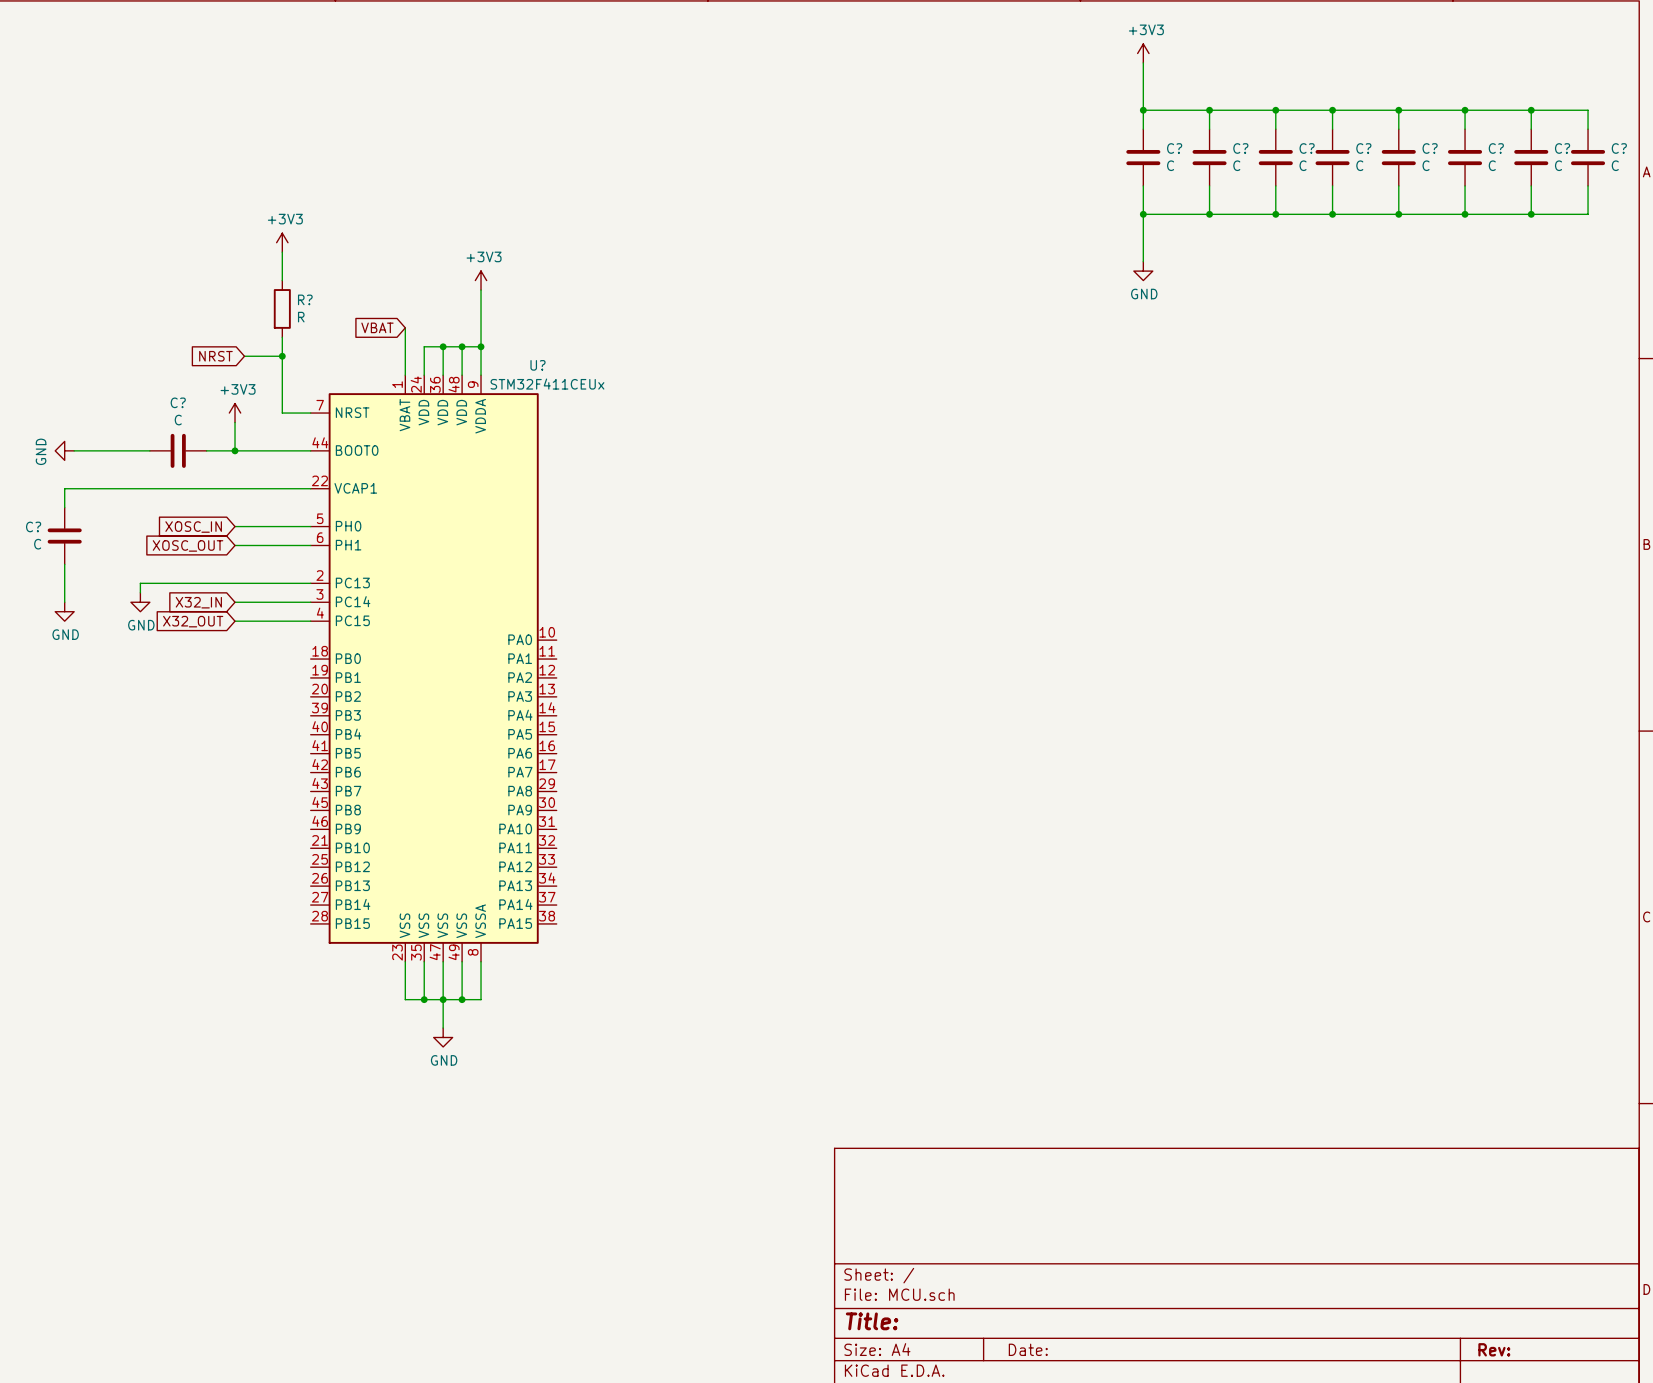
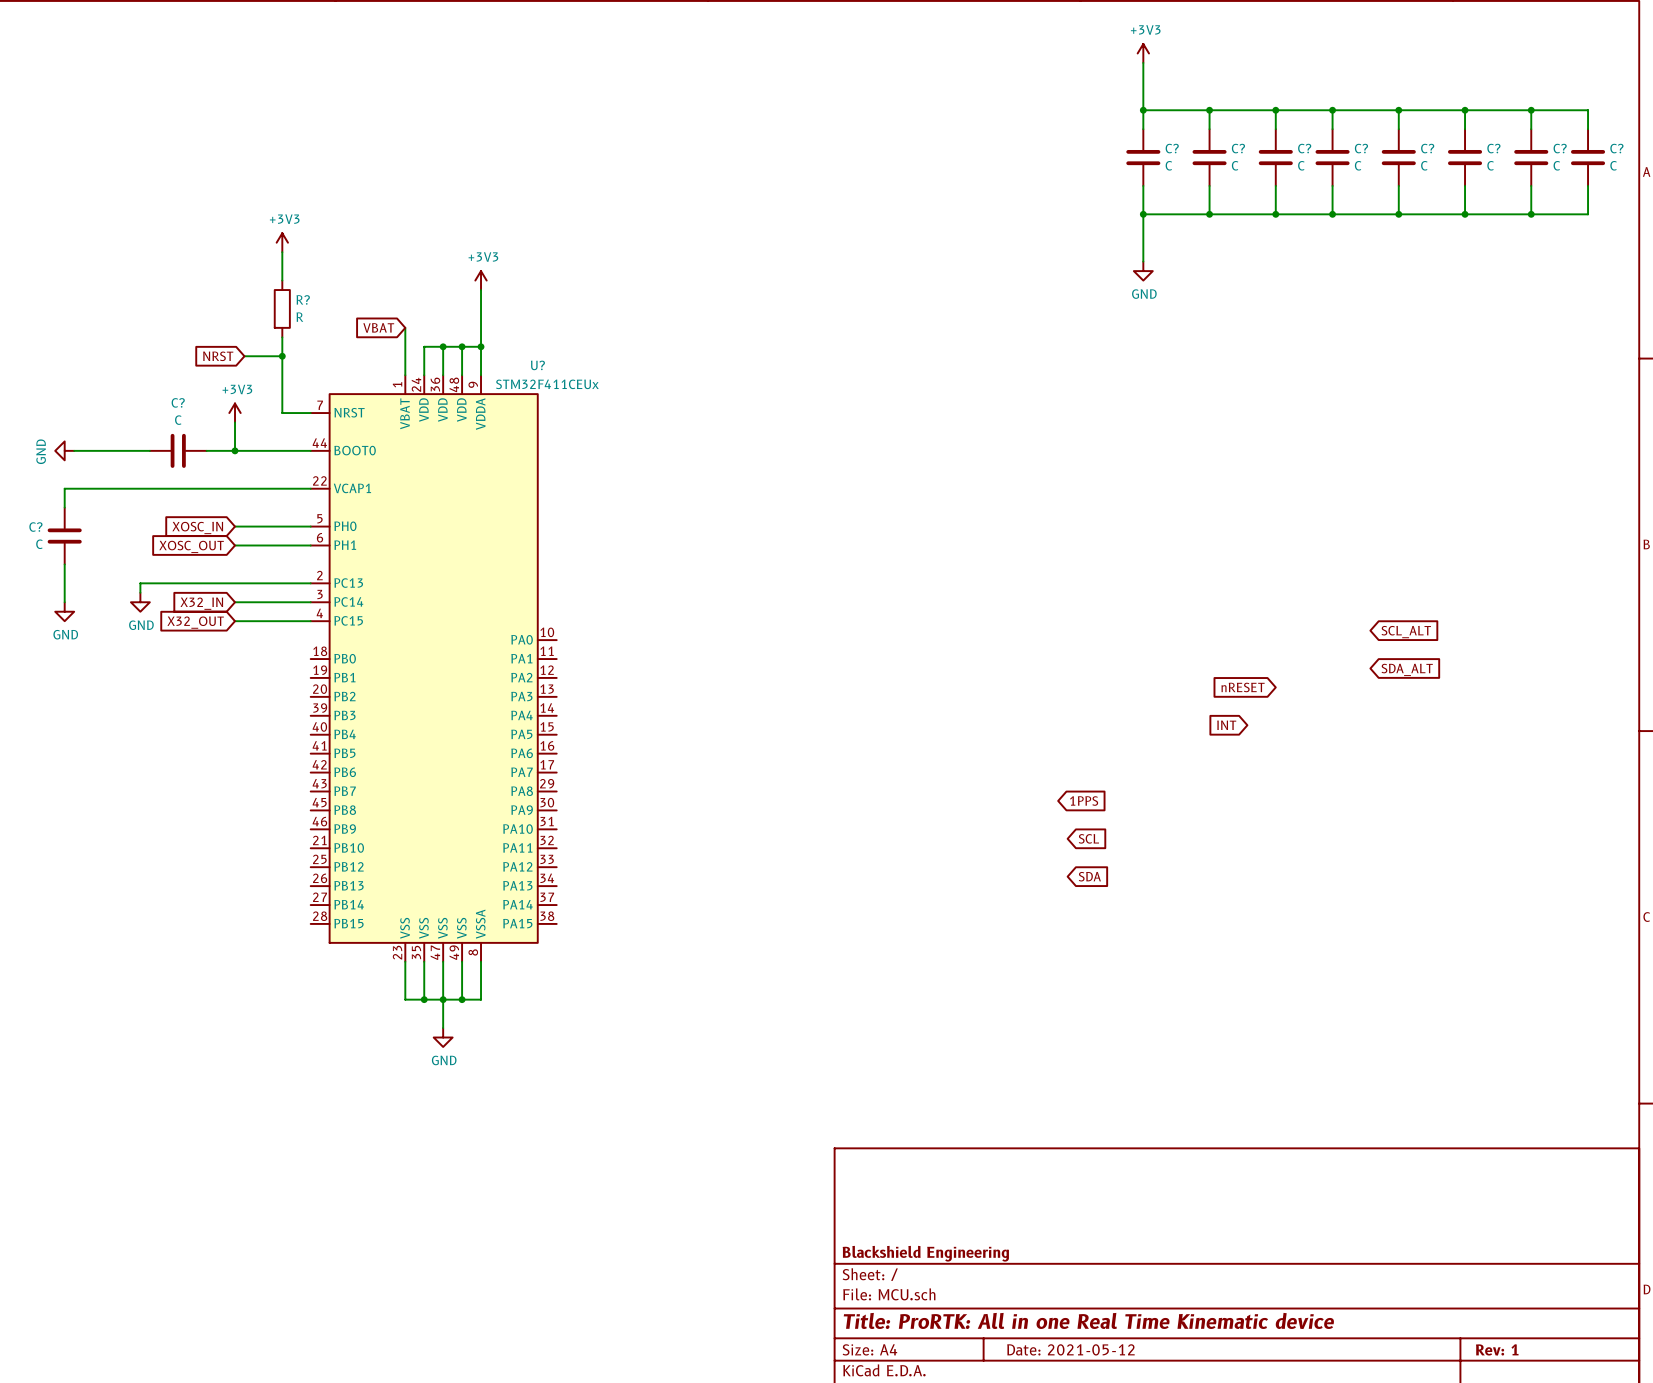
global label: none -> SCL_ALT (1406, 632)
global label: none -> SDA_ALT (1407, 669)
global label: none -> nRESET (1243, 687)
global label: none -> INT (1226, 725)
global label: none -> 1PPS (1084, 801)
global label: none -> SCL (1088, 838)
global label: none -> SDA (1089, 876)
title block: none -> Blackshield Engineering (925, 1253)
title block: Title: (872, 1321) -> Title: ProRTK: All in one Real Time Kinematic device (1088, 1320)
title block: Date: (1028, 1349) -> Date: 2021-05-12 (1070, 1349)
title block: Rev: (1494, 1349) -> Rev: 1 (1497, 1349)

